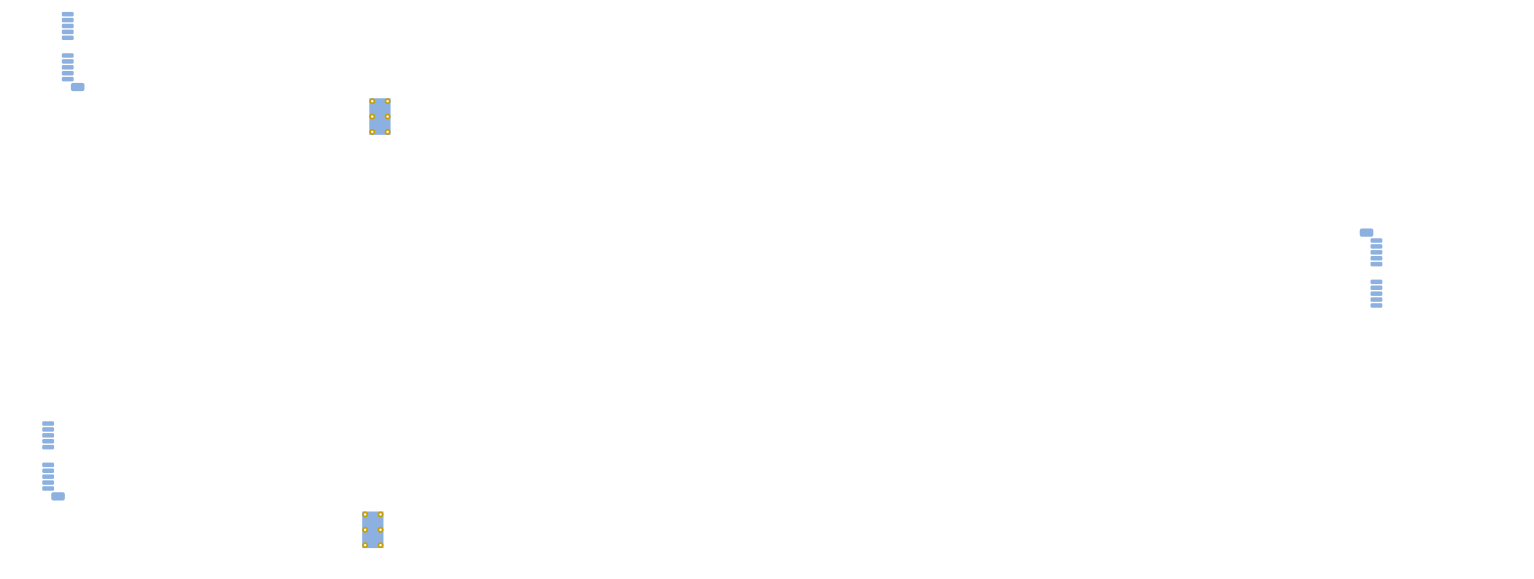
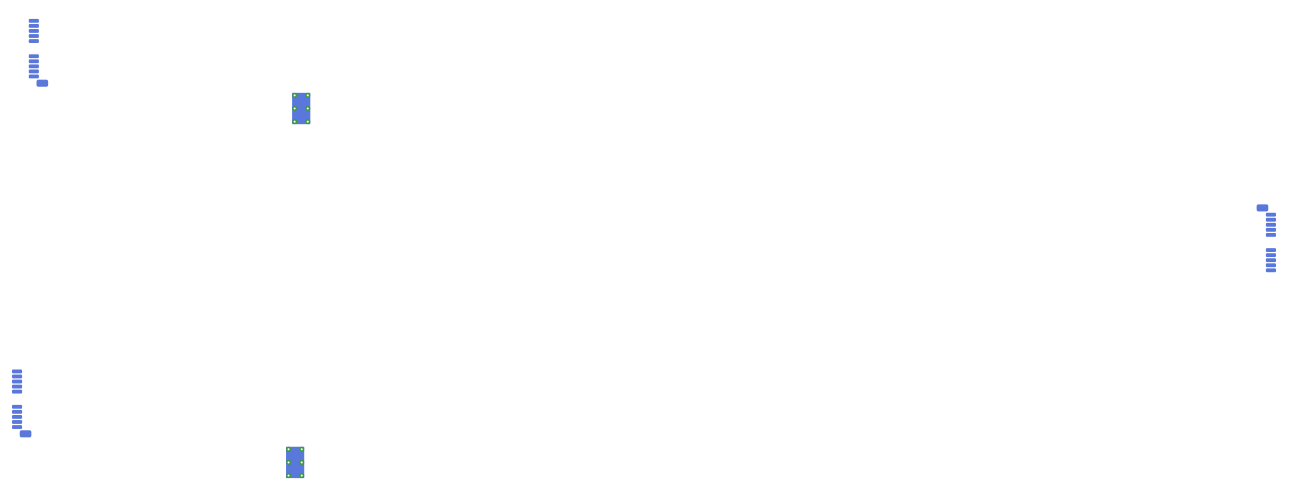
part position: (1371, 268) -> (1266, 238)

